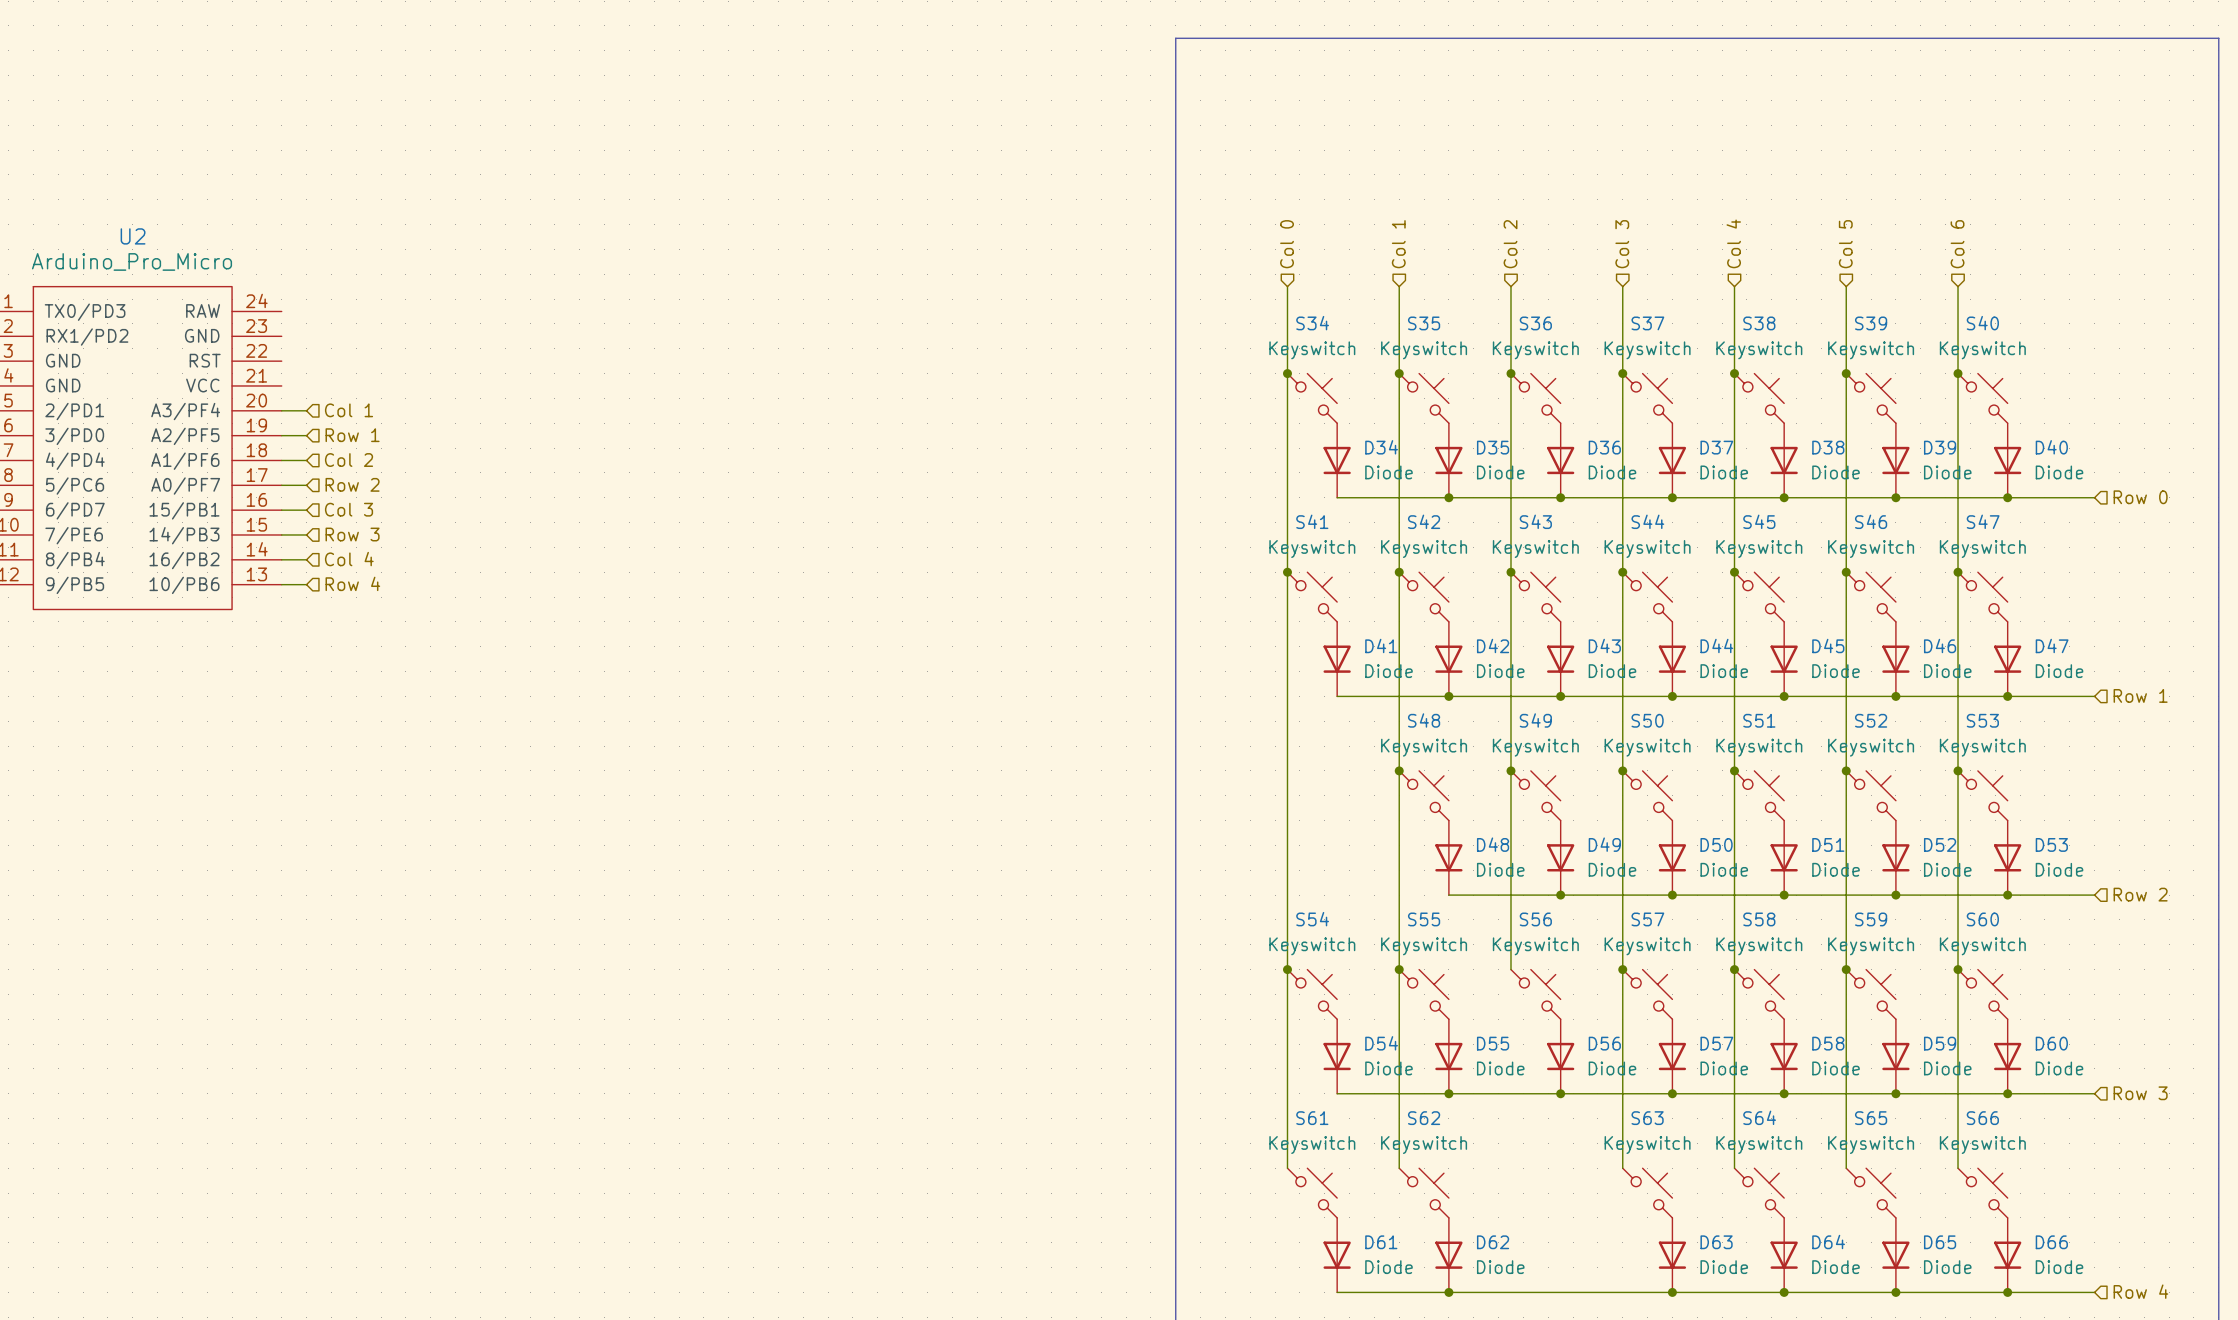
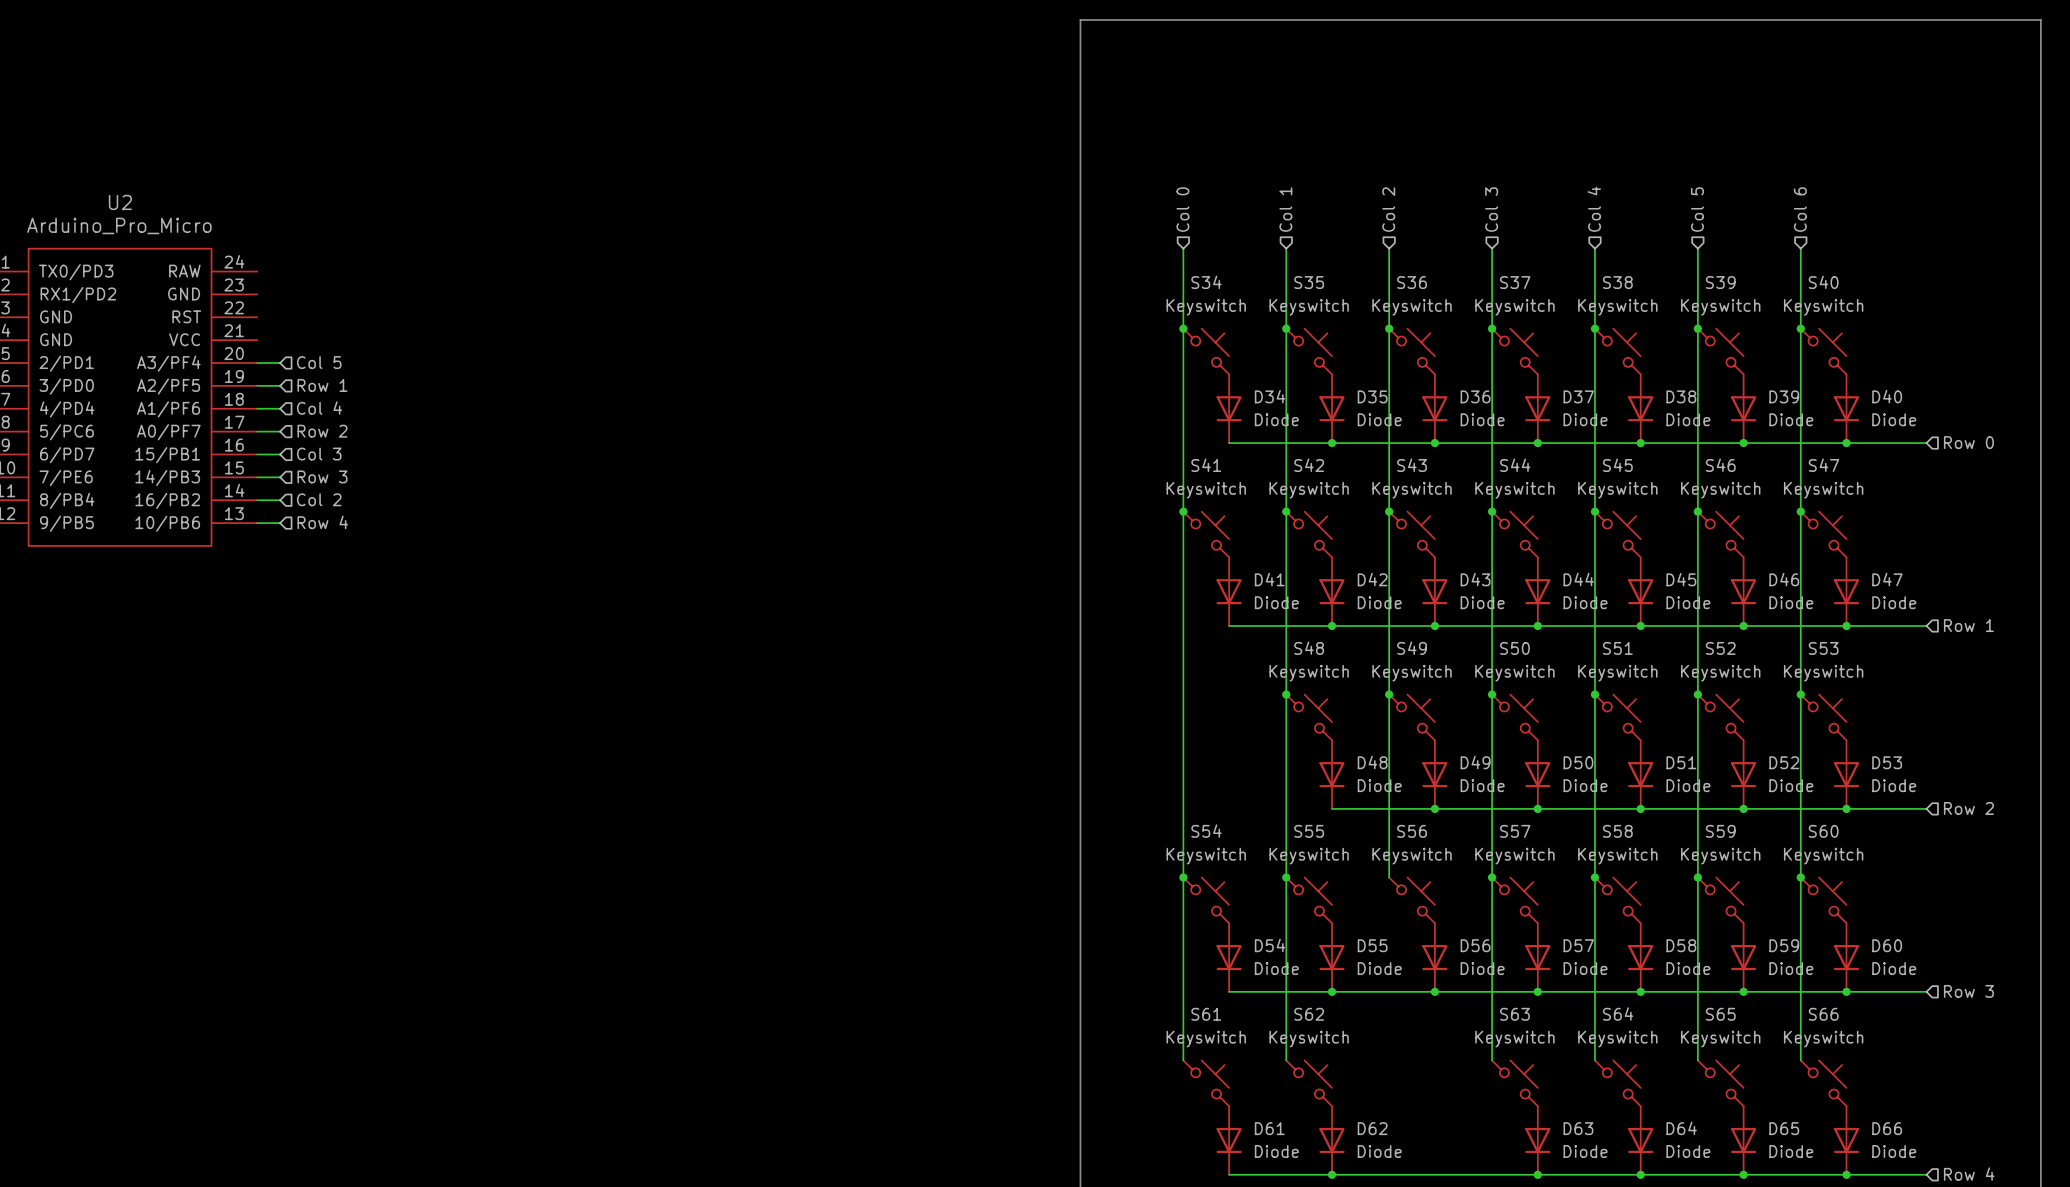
hierarchical label: Col 1 (349, 410) -> Col 5 (319, 362)
hierarchical label: Col 2 (349, 460) -> Col 4 (319, 408)
hierarchical label: Col 4 (349, 559) -> Col 2 (319, 499)

